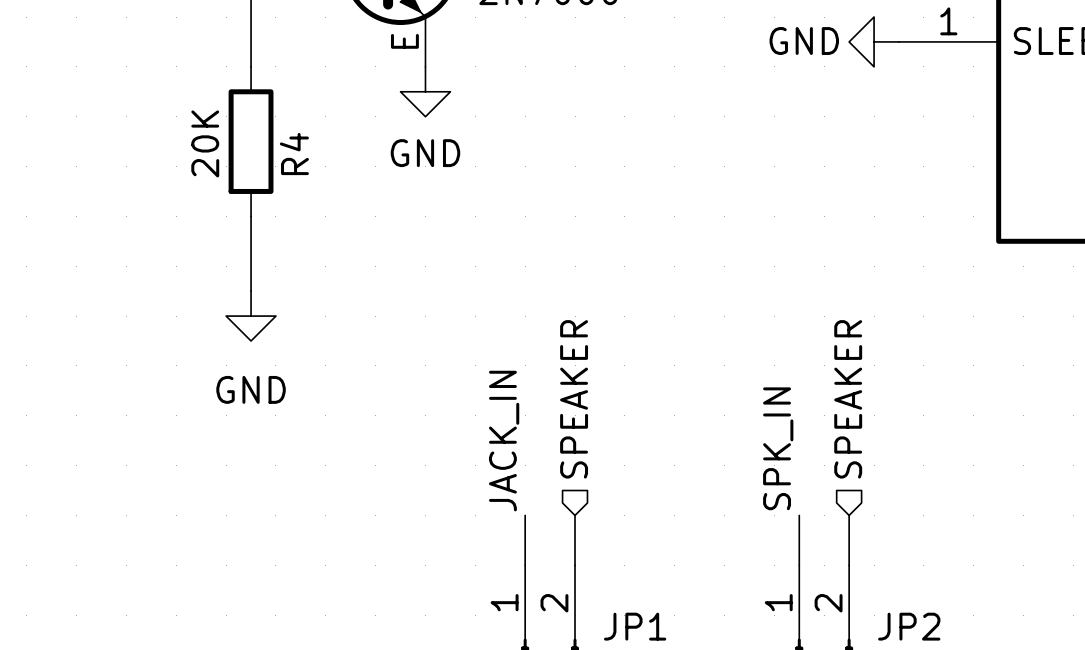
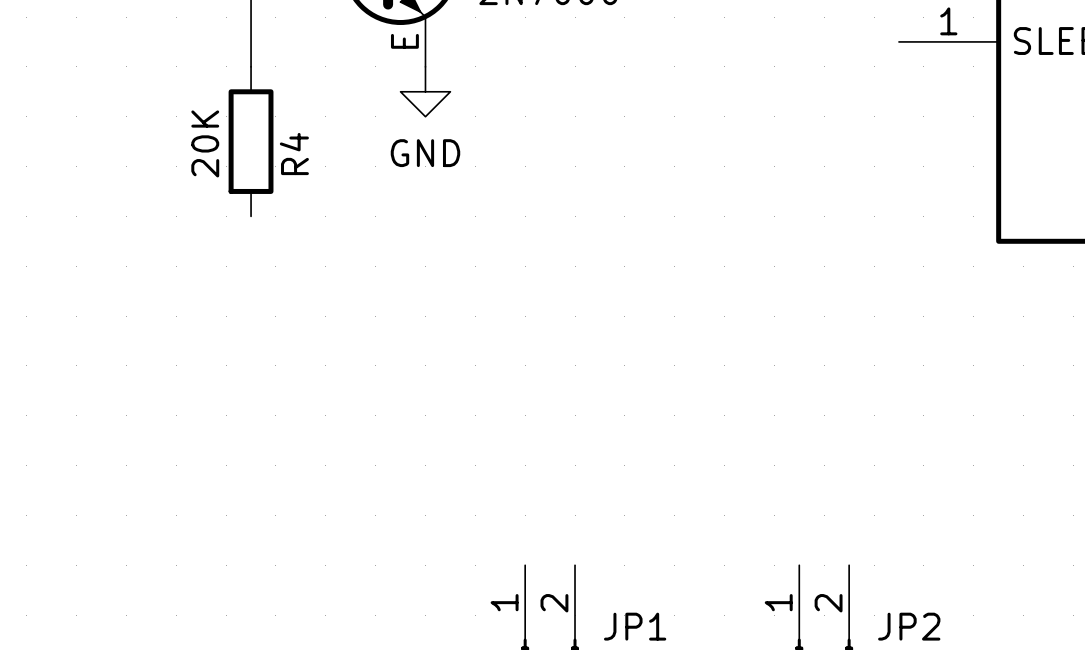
power symbol: GND (874, 41) -> none
wire: (251, 216) (251, 291) -> none
power symbol: GND (251, 316) -> none
hierarchical label: SPEAKER (574, 399) -> none
hierarchical label: SPEAKER (848, 399) -> none
label: JACK_IN (504, 441) -> none
label: SPK_IN (778, 448) -> none
wire: (525, 515) (525, 565) -> none
wire: (575, 515) (575, 565) -> none
wire: (799, 515) (799, 565) -> none
wire: (849, 515) (849, 565) -> none

